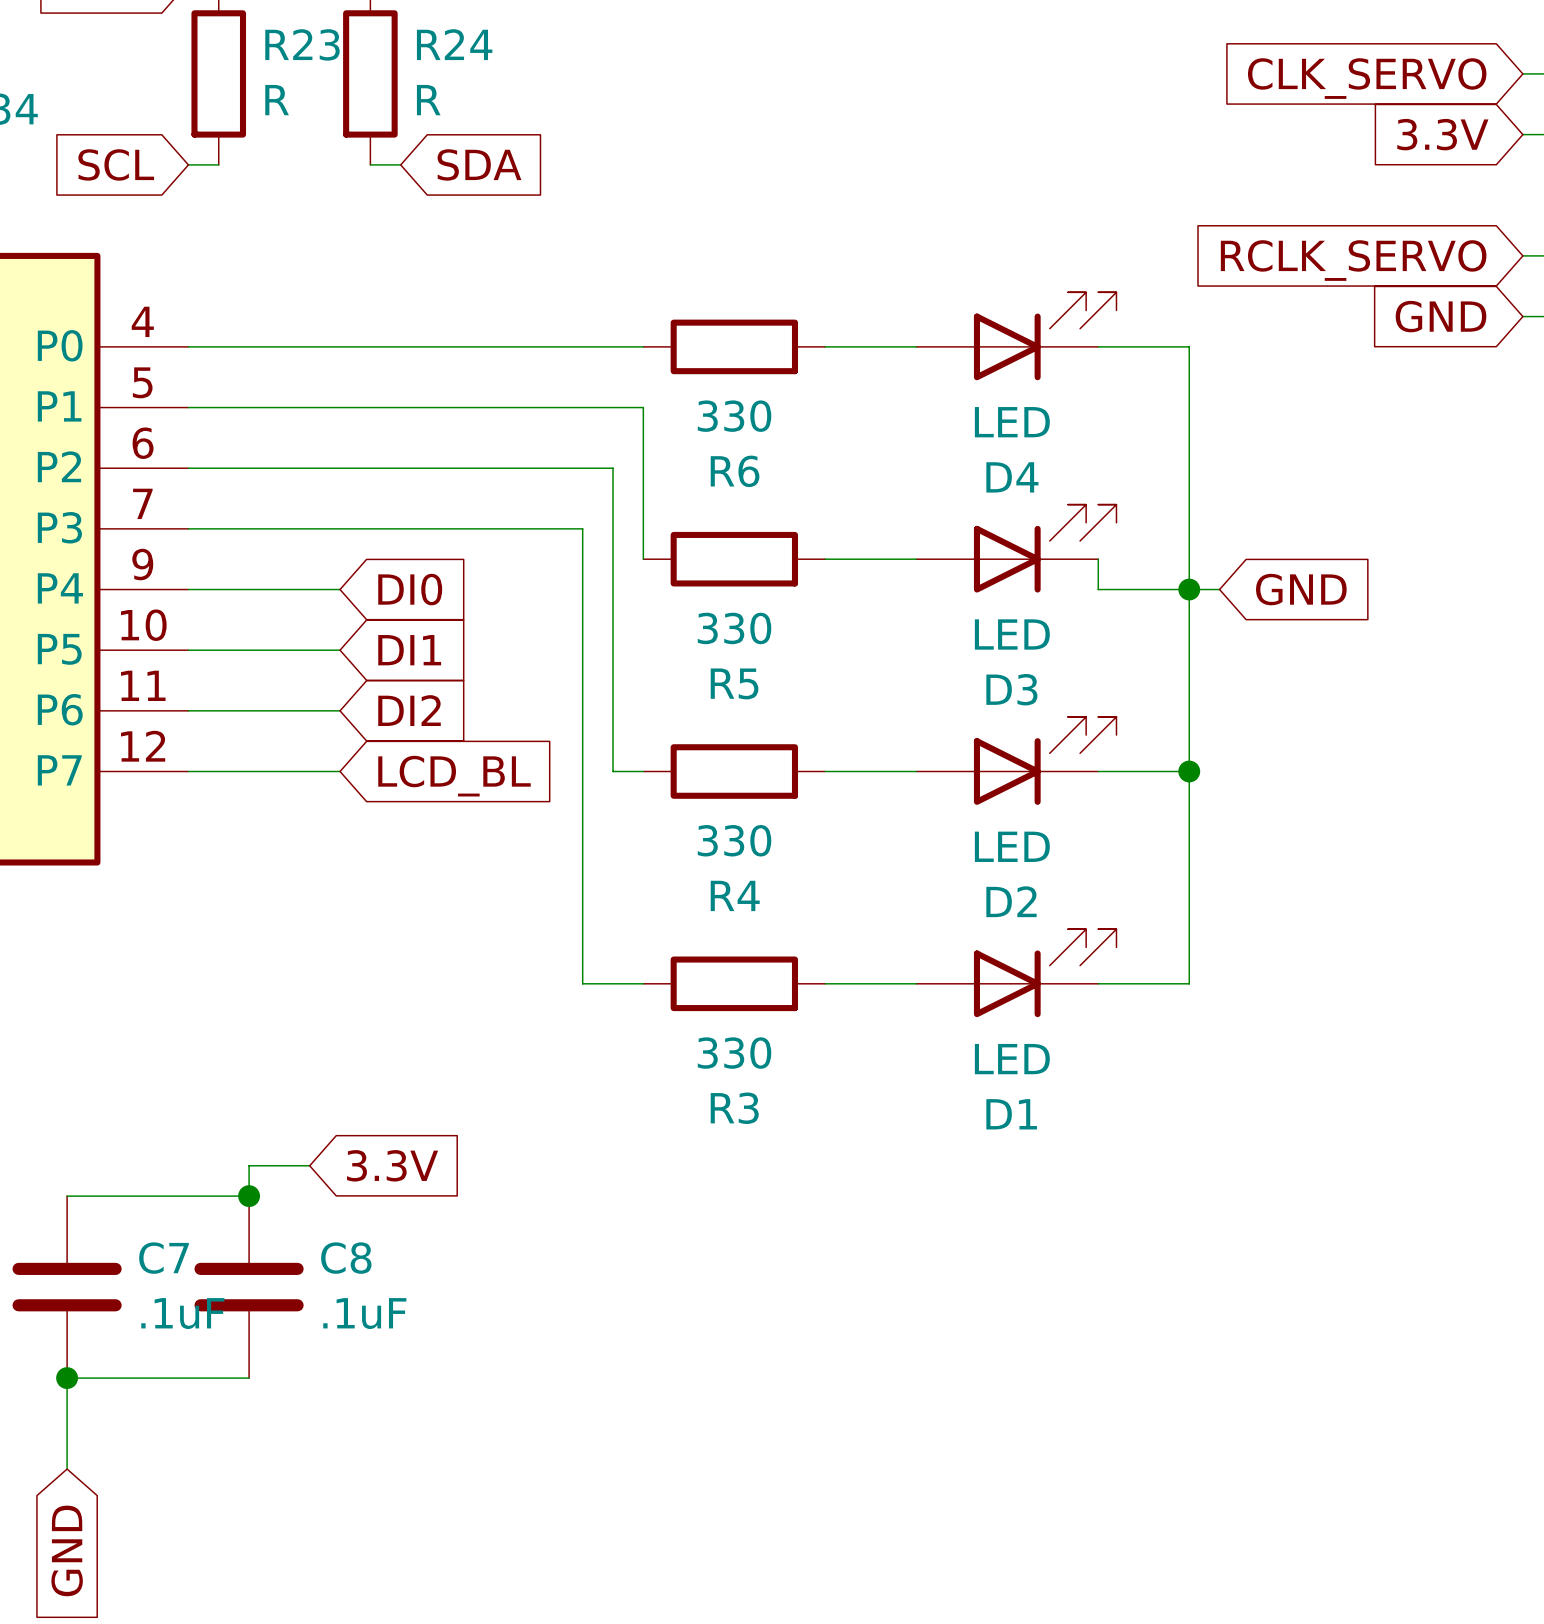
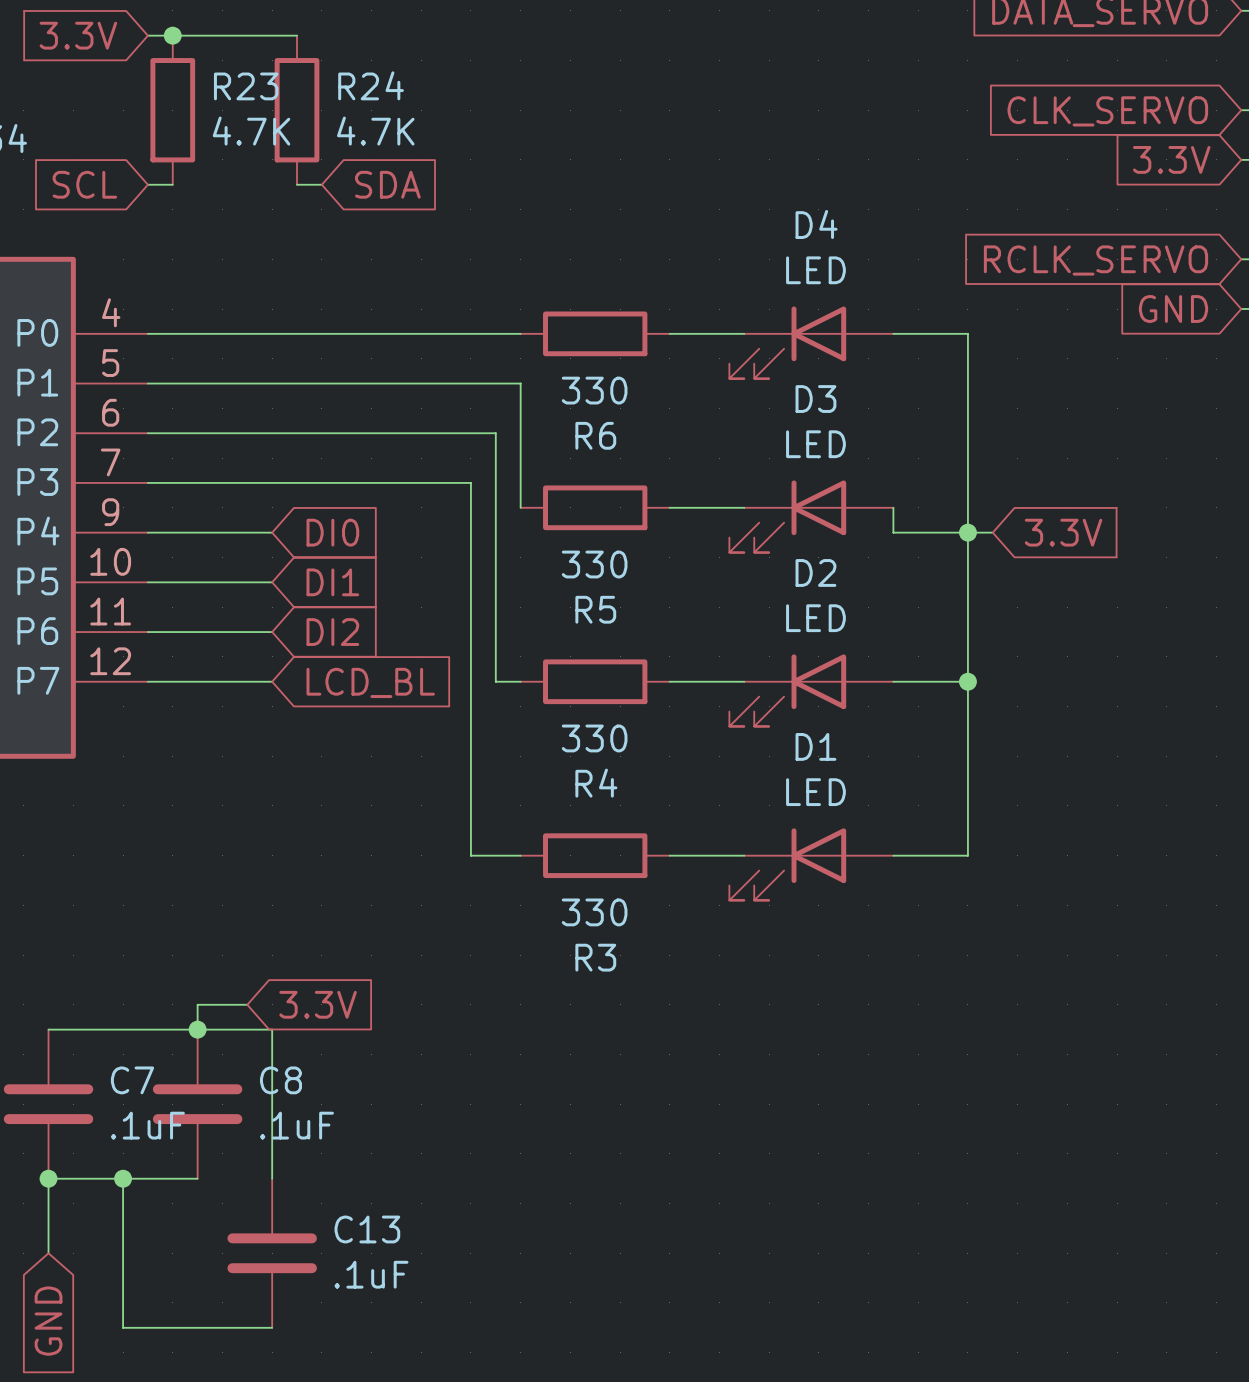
R23 value: R (277, 100) -> 4.7K (251, 131)
R24 value: R (428, 100) -> 4.7K (375, 131)
D4 rotation: 0° (1045, 336) -> 180° (787, 342)
D3 rotation: 0° (1045, 548) -> 180° (787, 516)
global label: GND (1301, 589) -> 3.3V (1063, 532)
D2 rotation: 0° (1045, 760) -> 180° (787, 690)
D1 rotation: 0° (1045, 973) -> 180° (787, 864)
wire: none -> (197, 1029) (272, 1029) (272, 1178)
wire: none -> (123, 1178) (123, 1327) (272, 1327)
junction: none -> (123, 1178)
C13: none -> .1uF (272, 1253)

